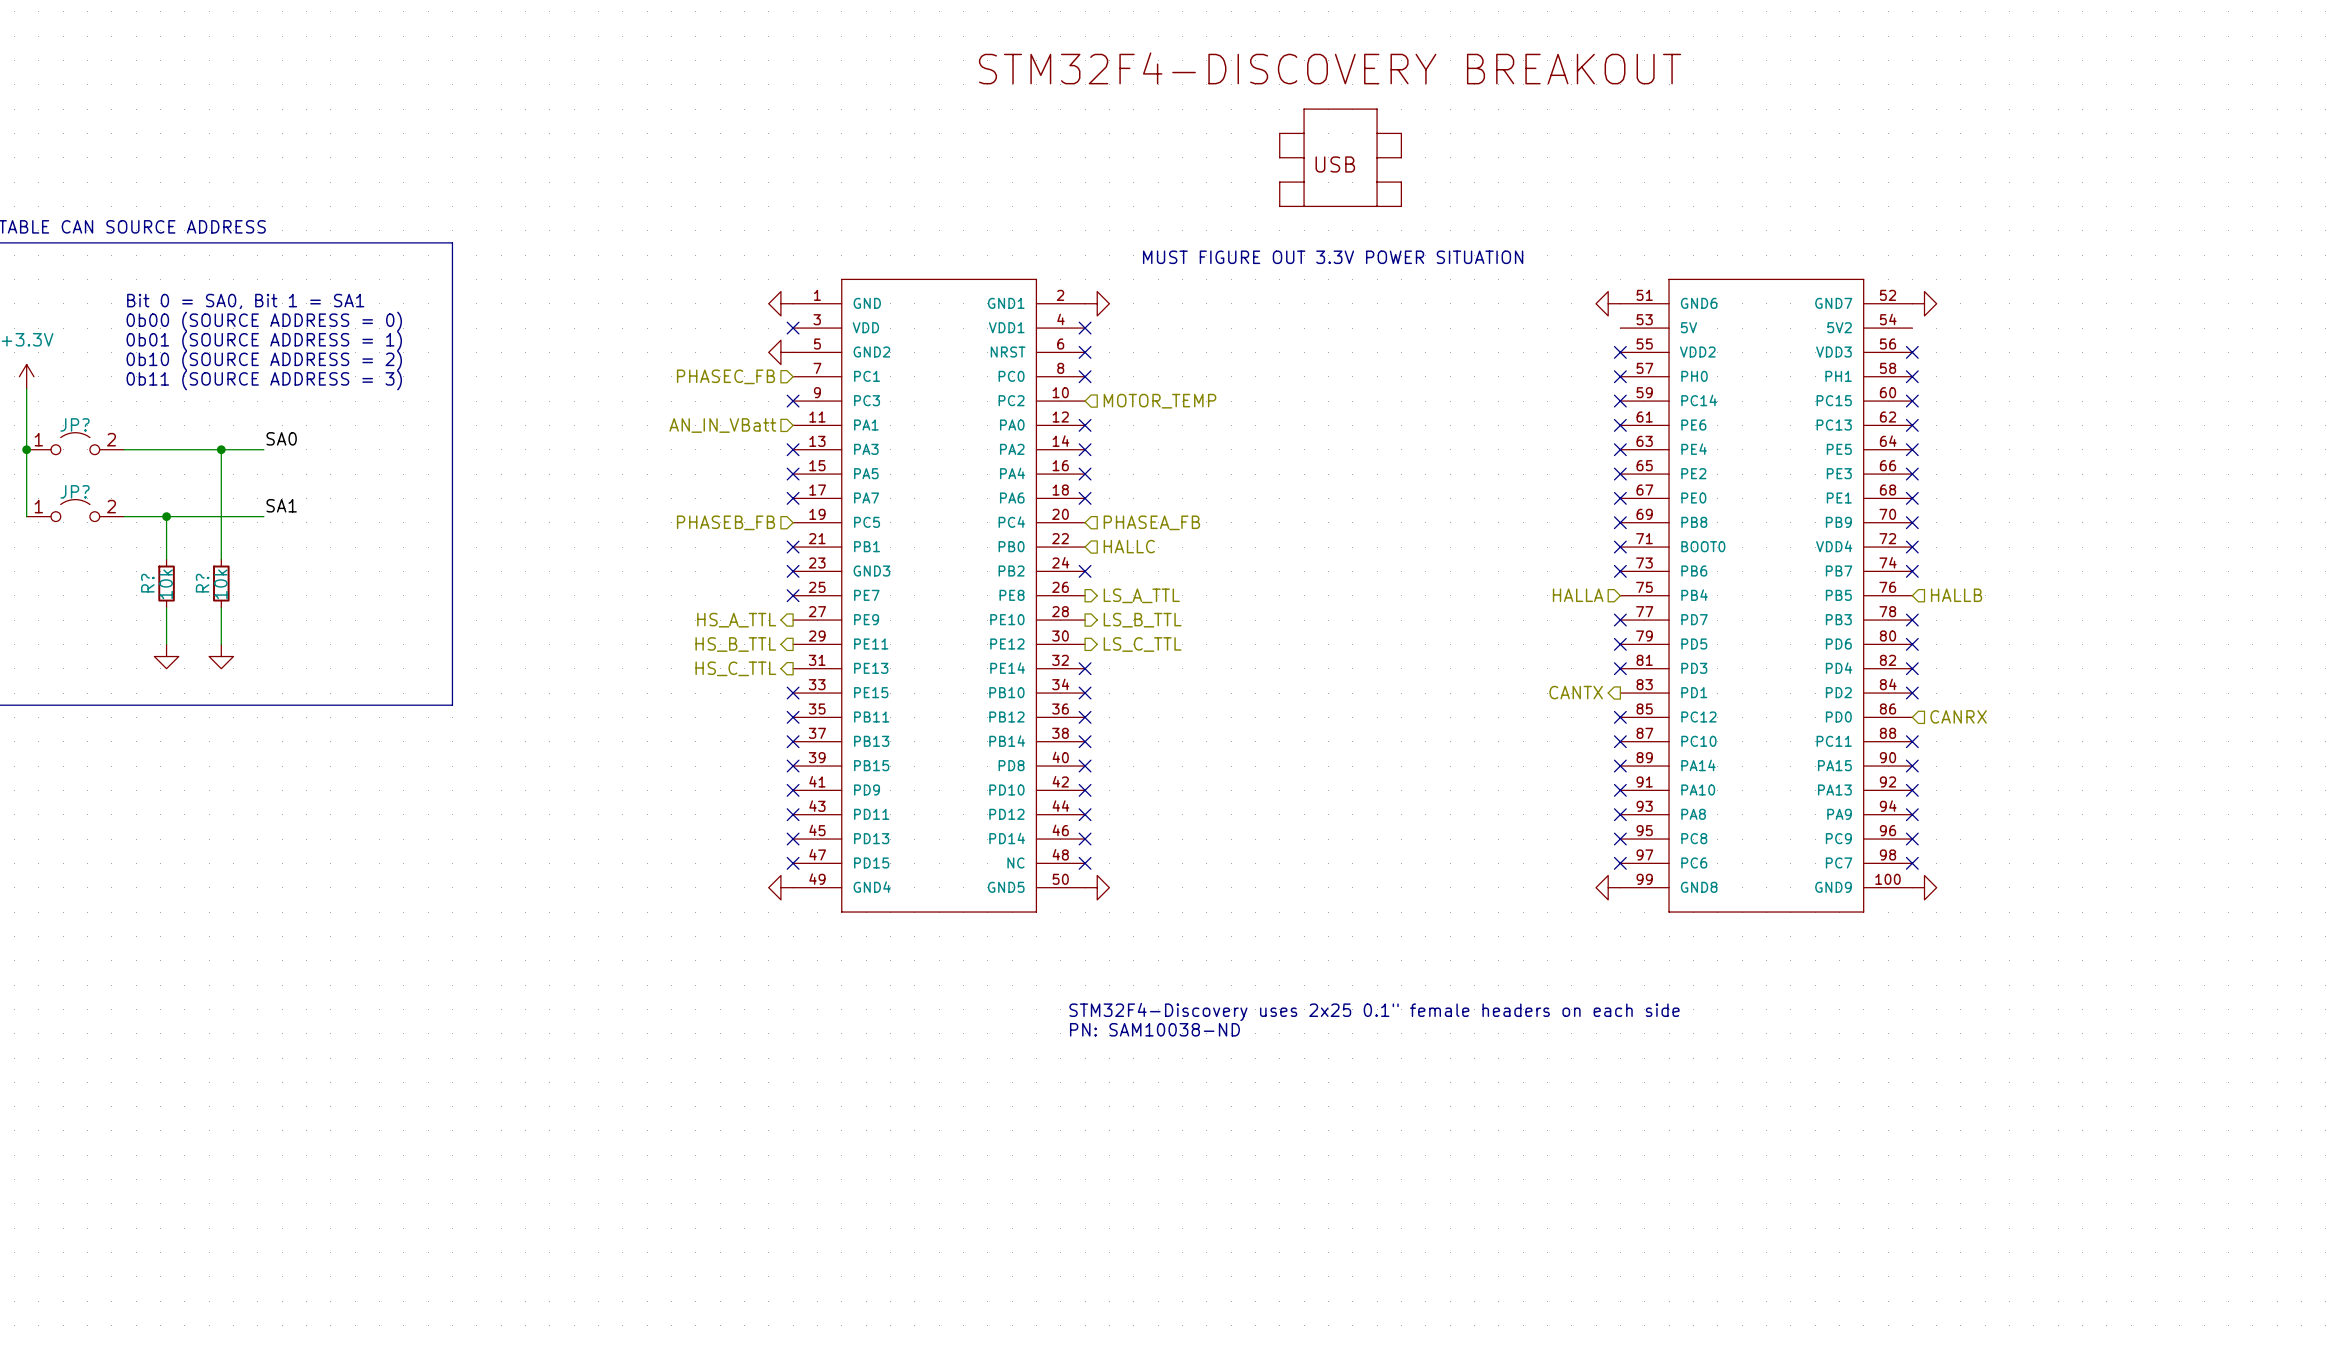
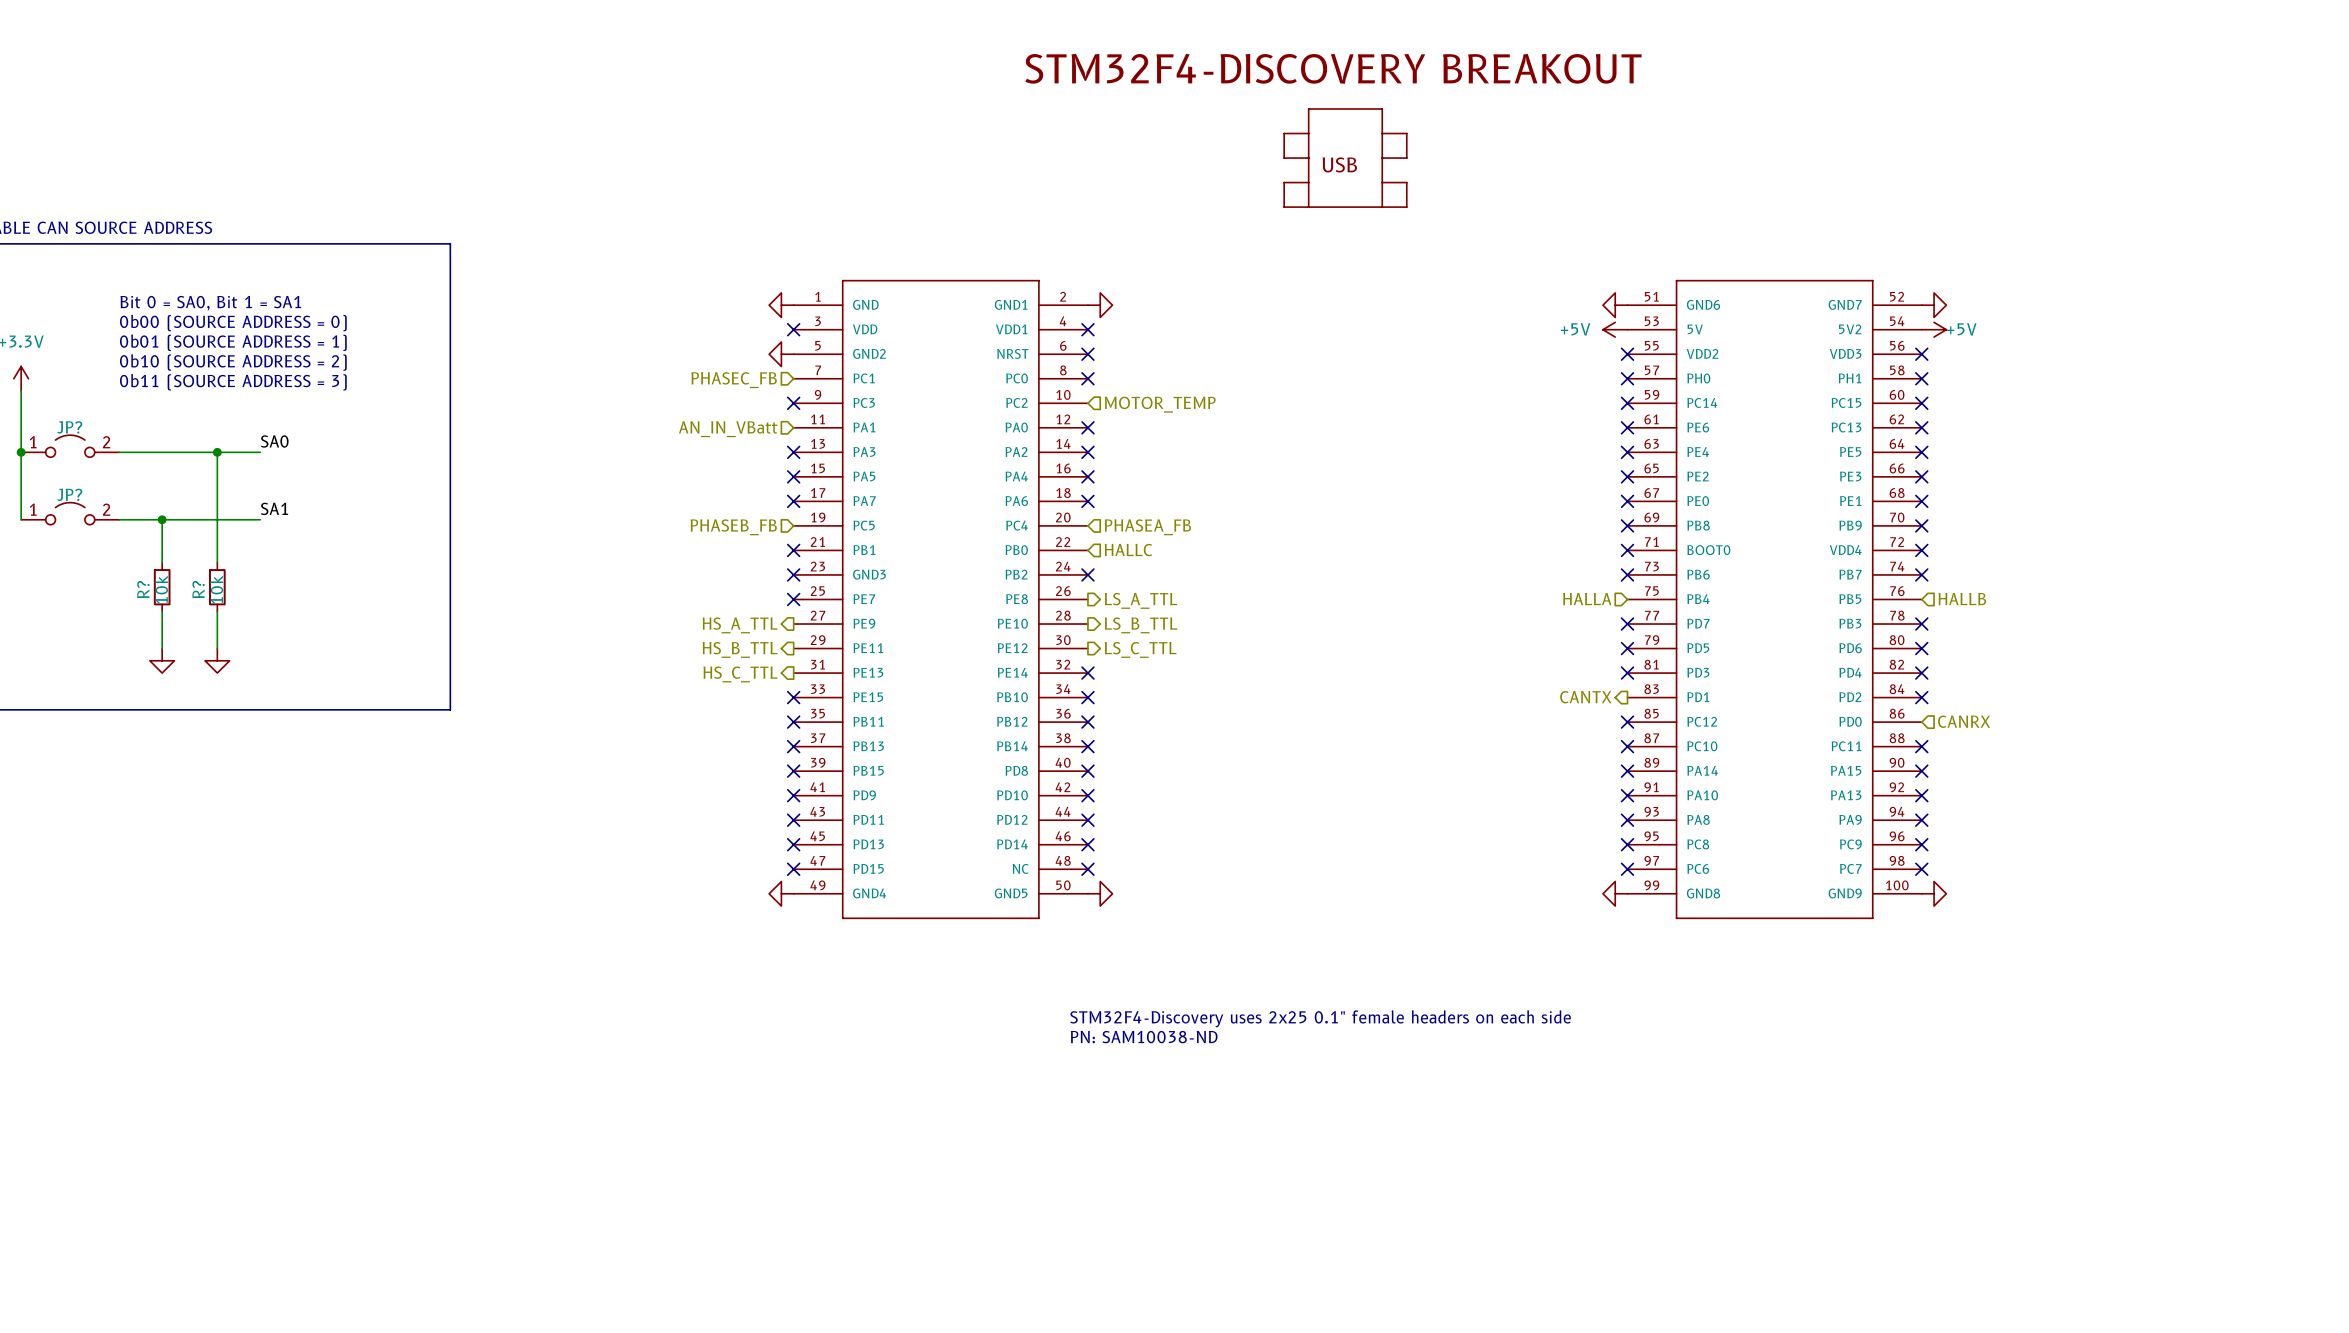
text: MUST FIGURE OUT 3.3V POWER SITUATION (1333, 257) -> none
power symbol: none -> +5V (1615, 329)
power symbol: none -> +5V (1934, 329)

